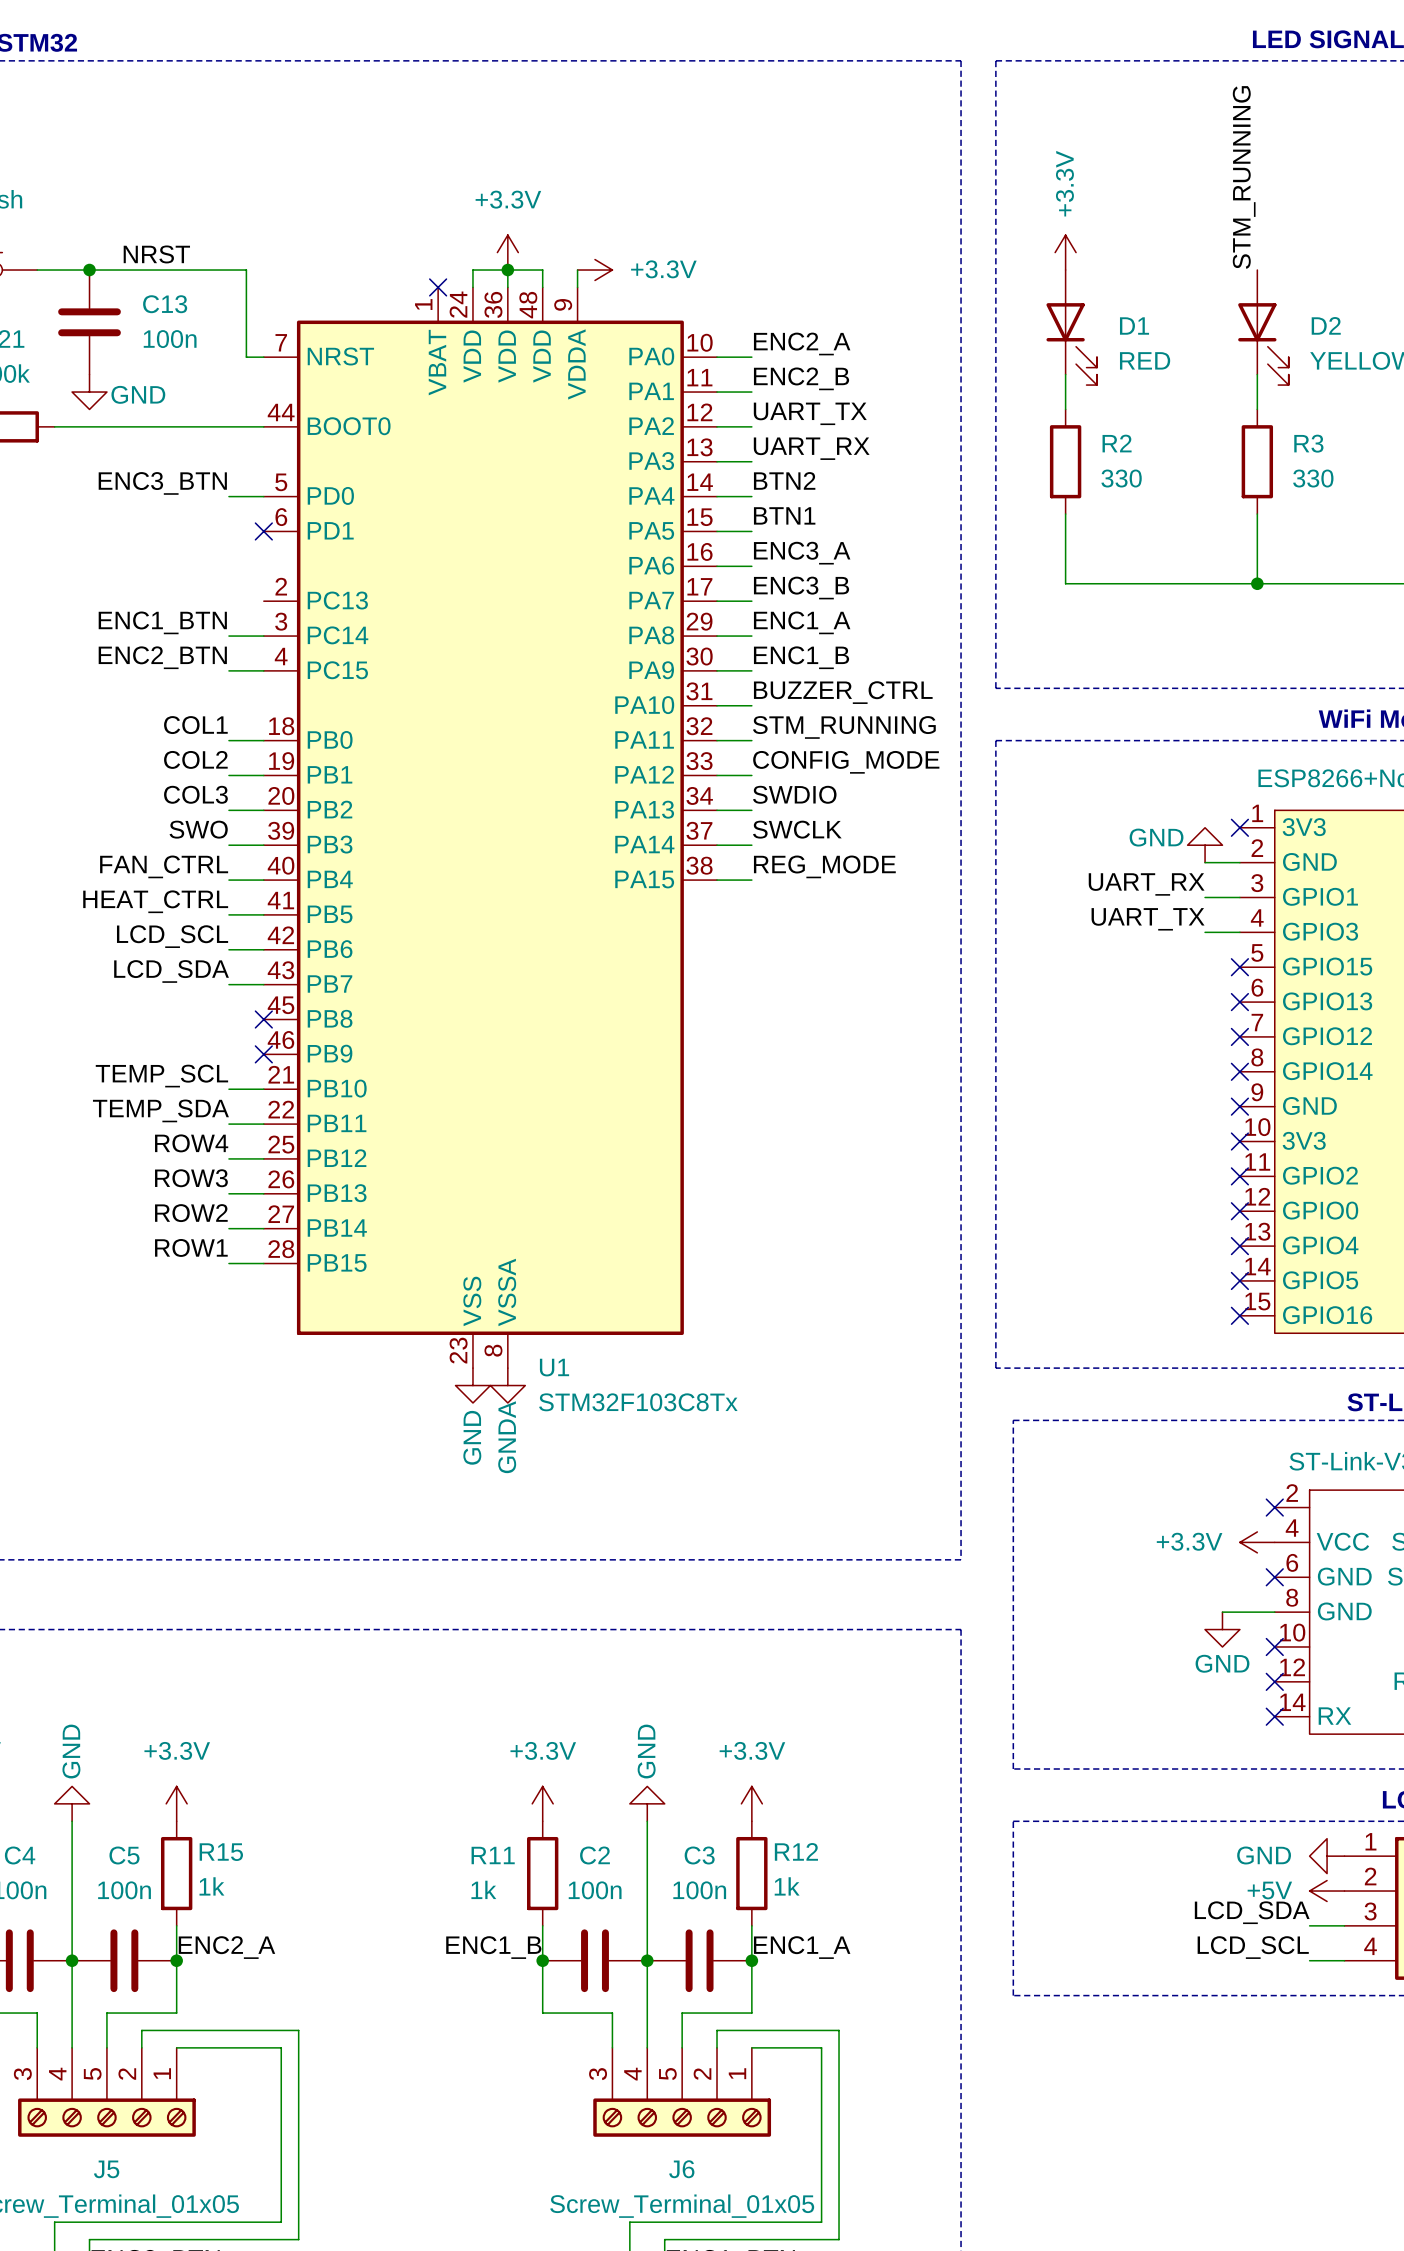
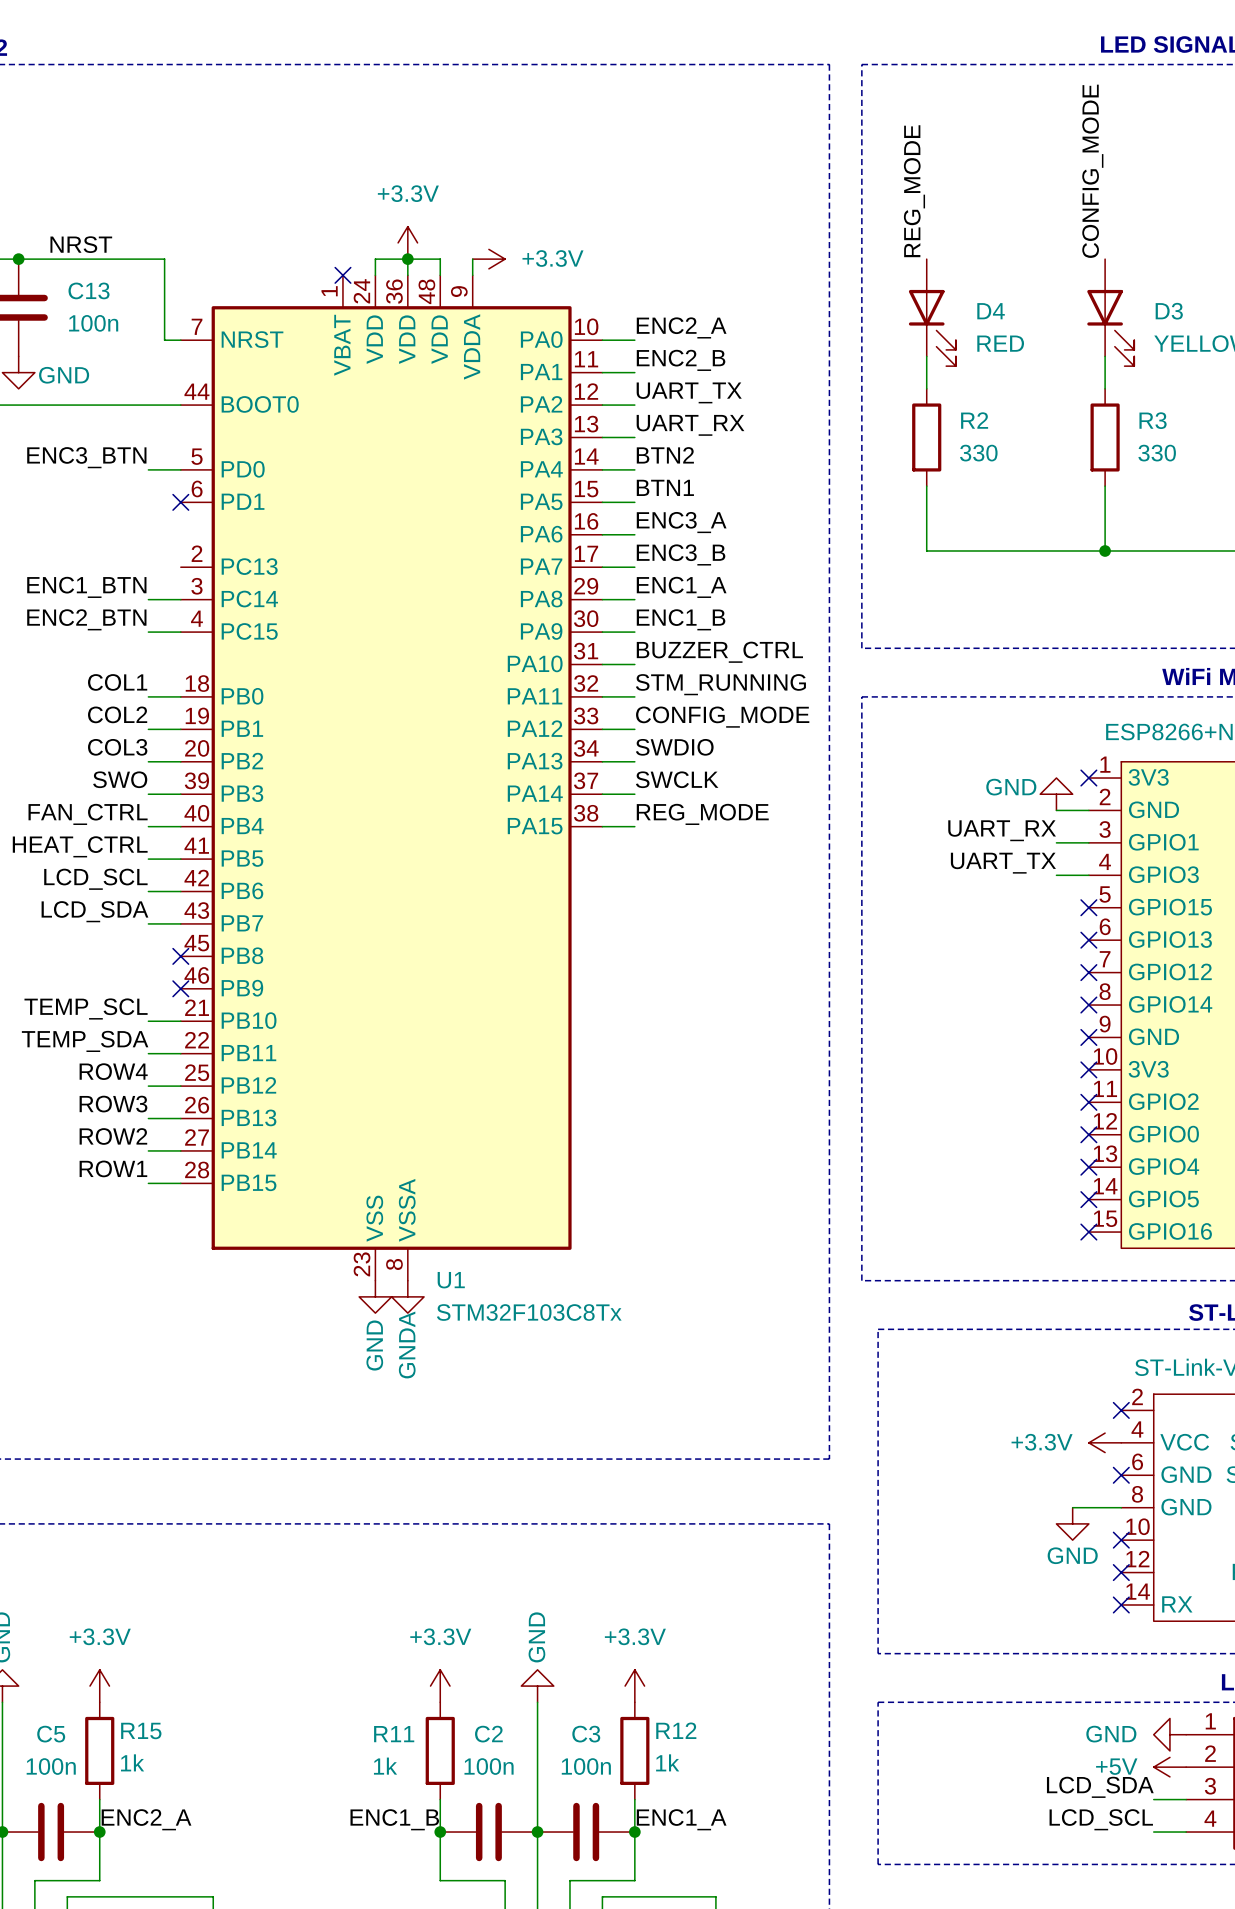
label: STM_RUNNING (1244, 177) -> CONFIG_MODE (1092, 171)
label: none -> REG_MODE (914, 191)
power symbol: +3.3V (1065, 252) -> none
D2 name: D2 (1326, 325) -> D3 (1169, 311)
D1 name: D1 (1134, 326) -> D4 (991, 311)

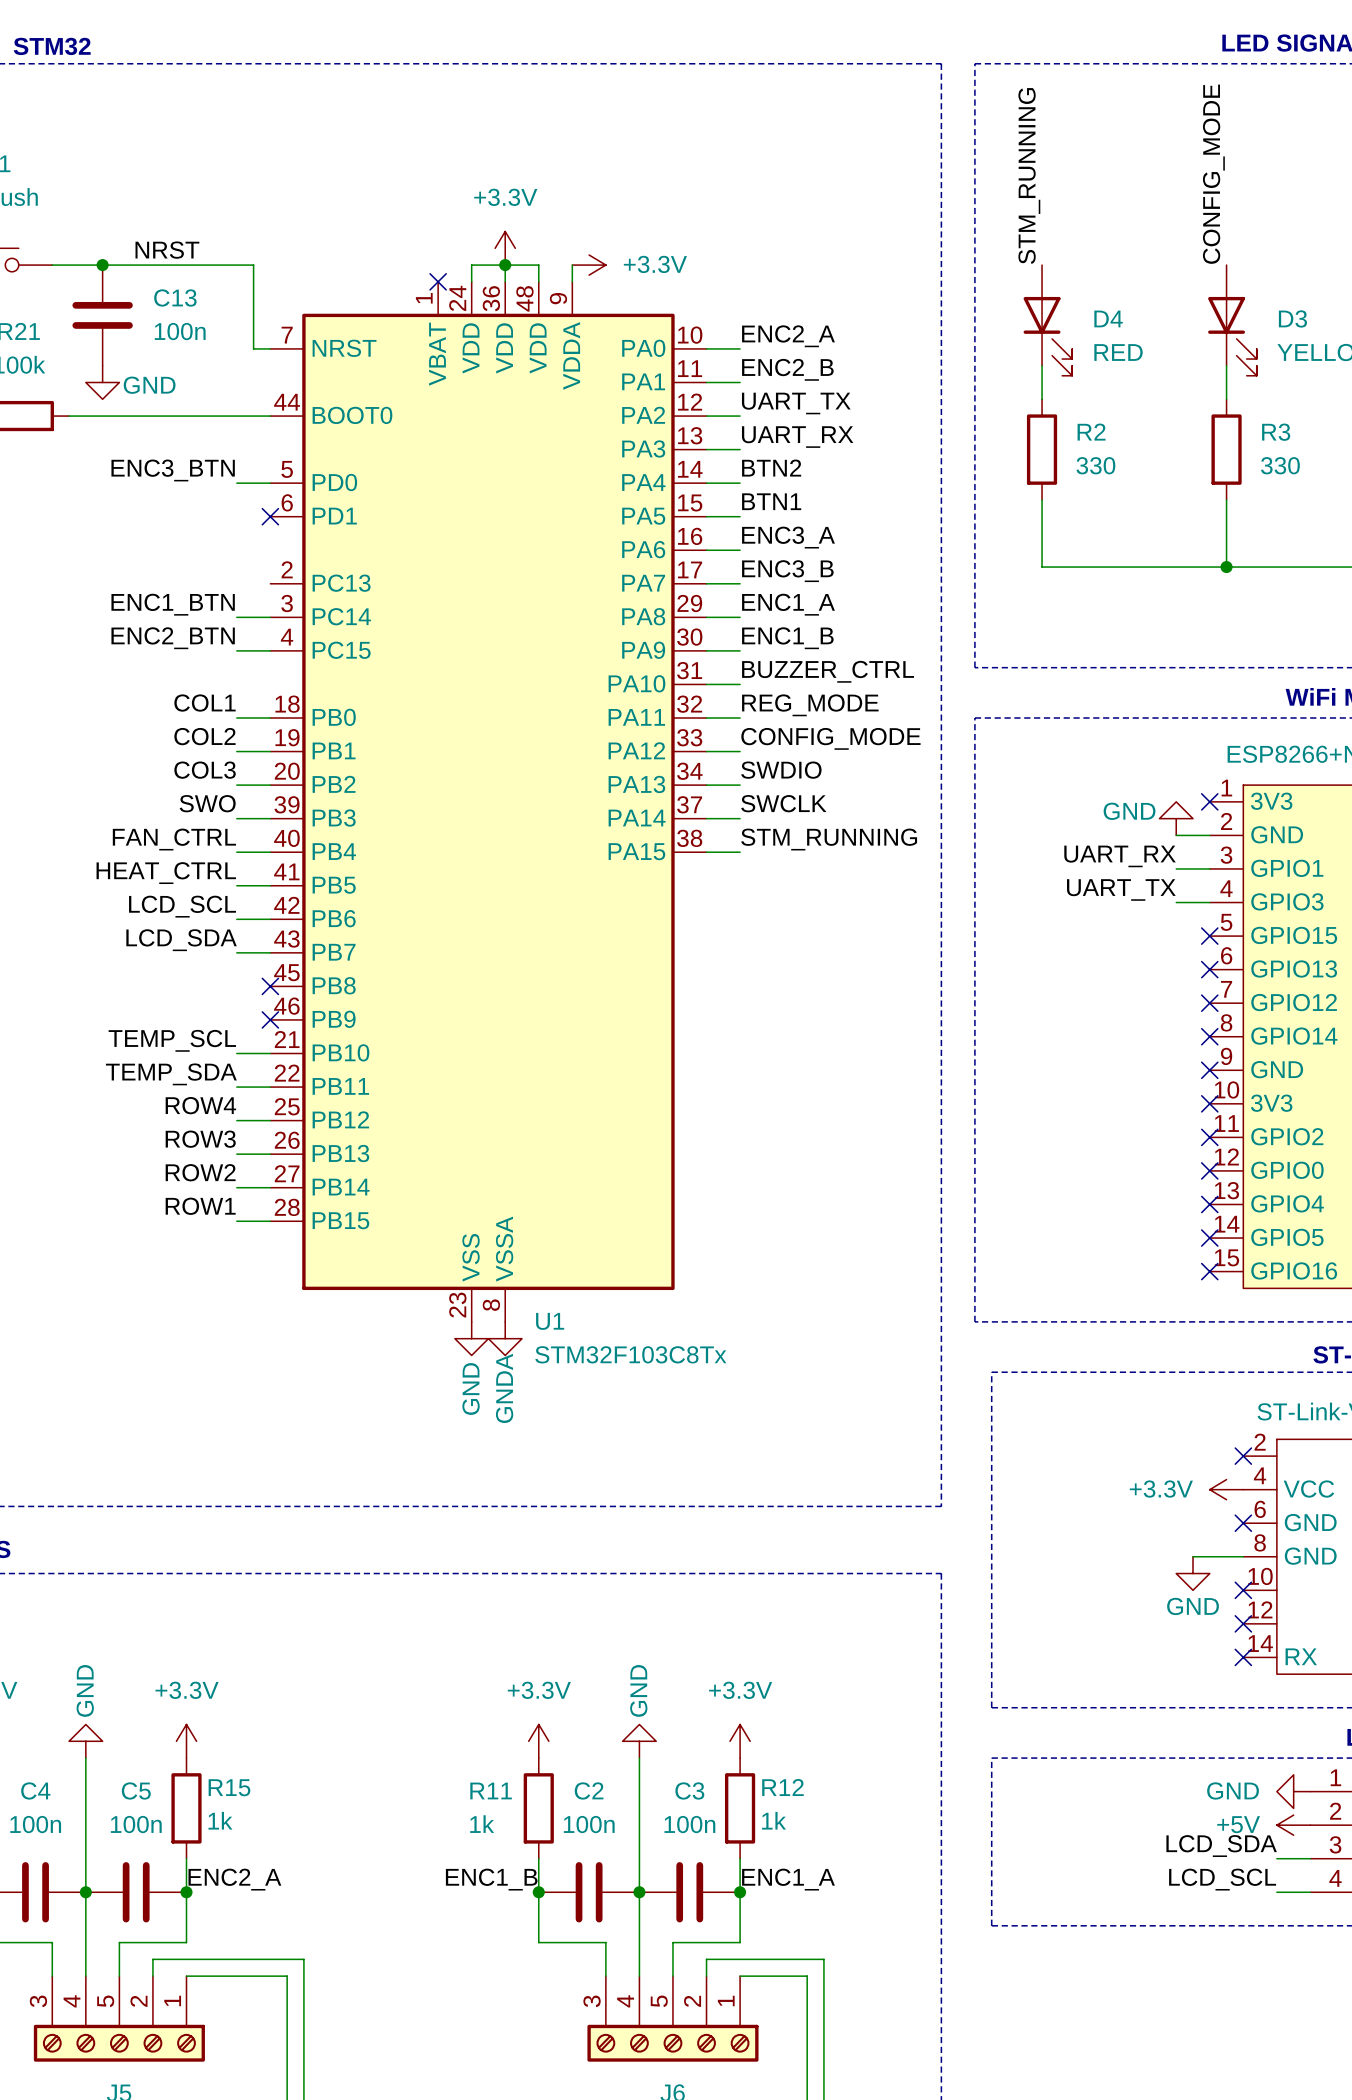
label: REG_MODE (914, 191) -> STM_RUNNING (1029, 176)
label: STM_RUNNING (720, 684) -> REG_MODE (810, 705)
label: REG_MODE (702, 814) -> STM_RUNNING (829, 839)

